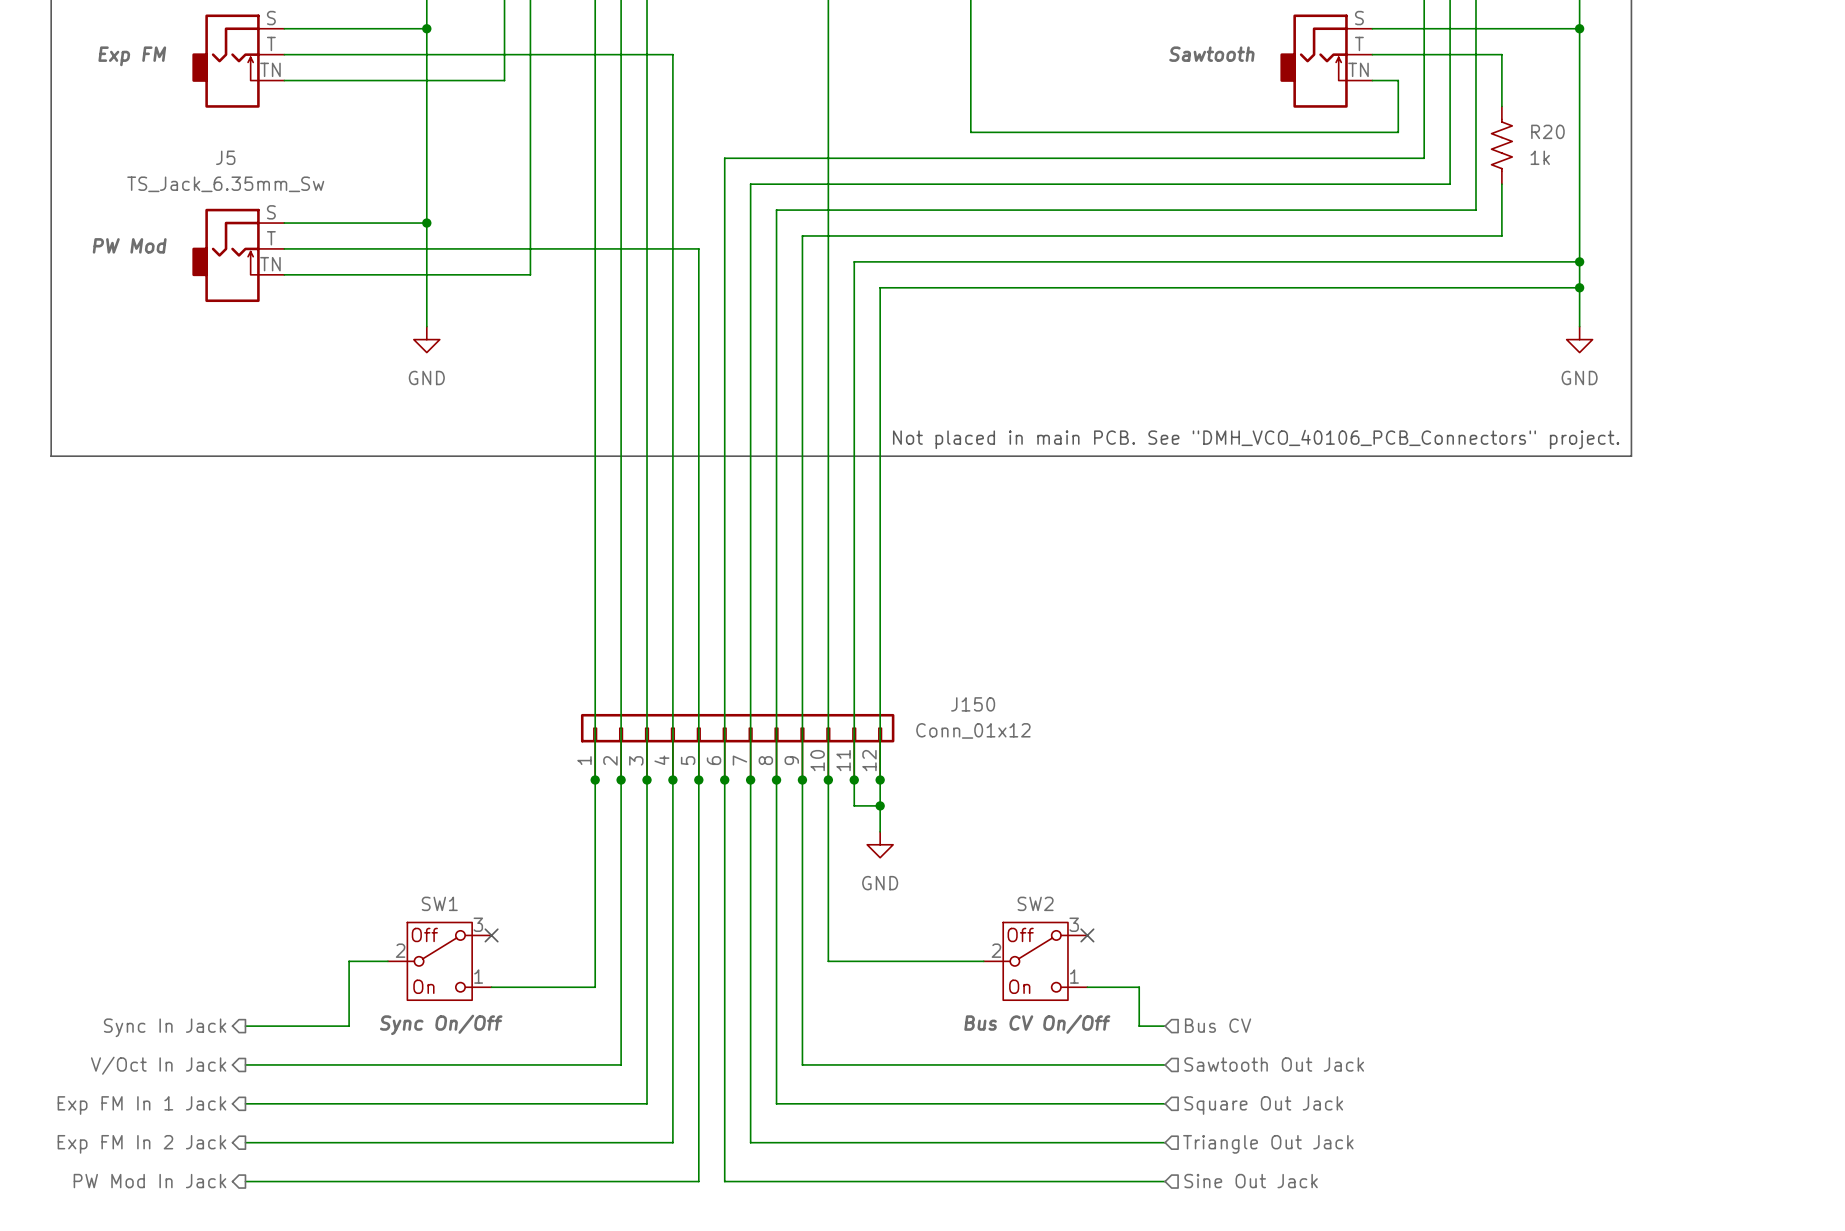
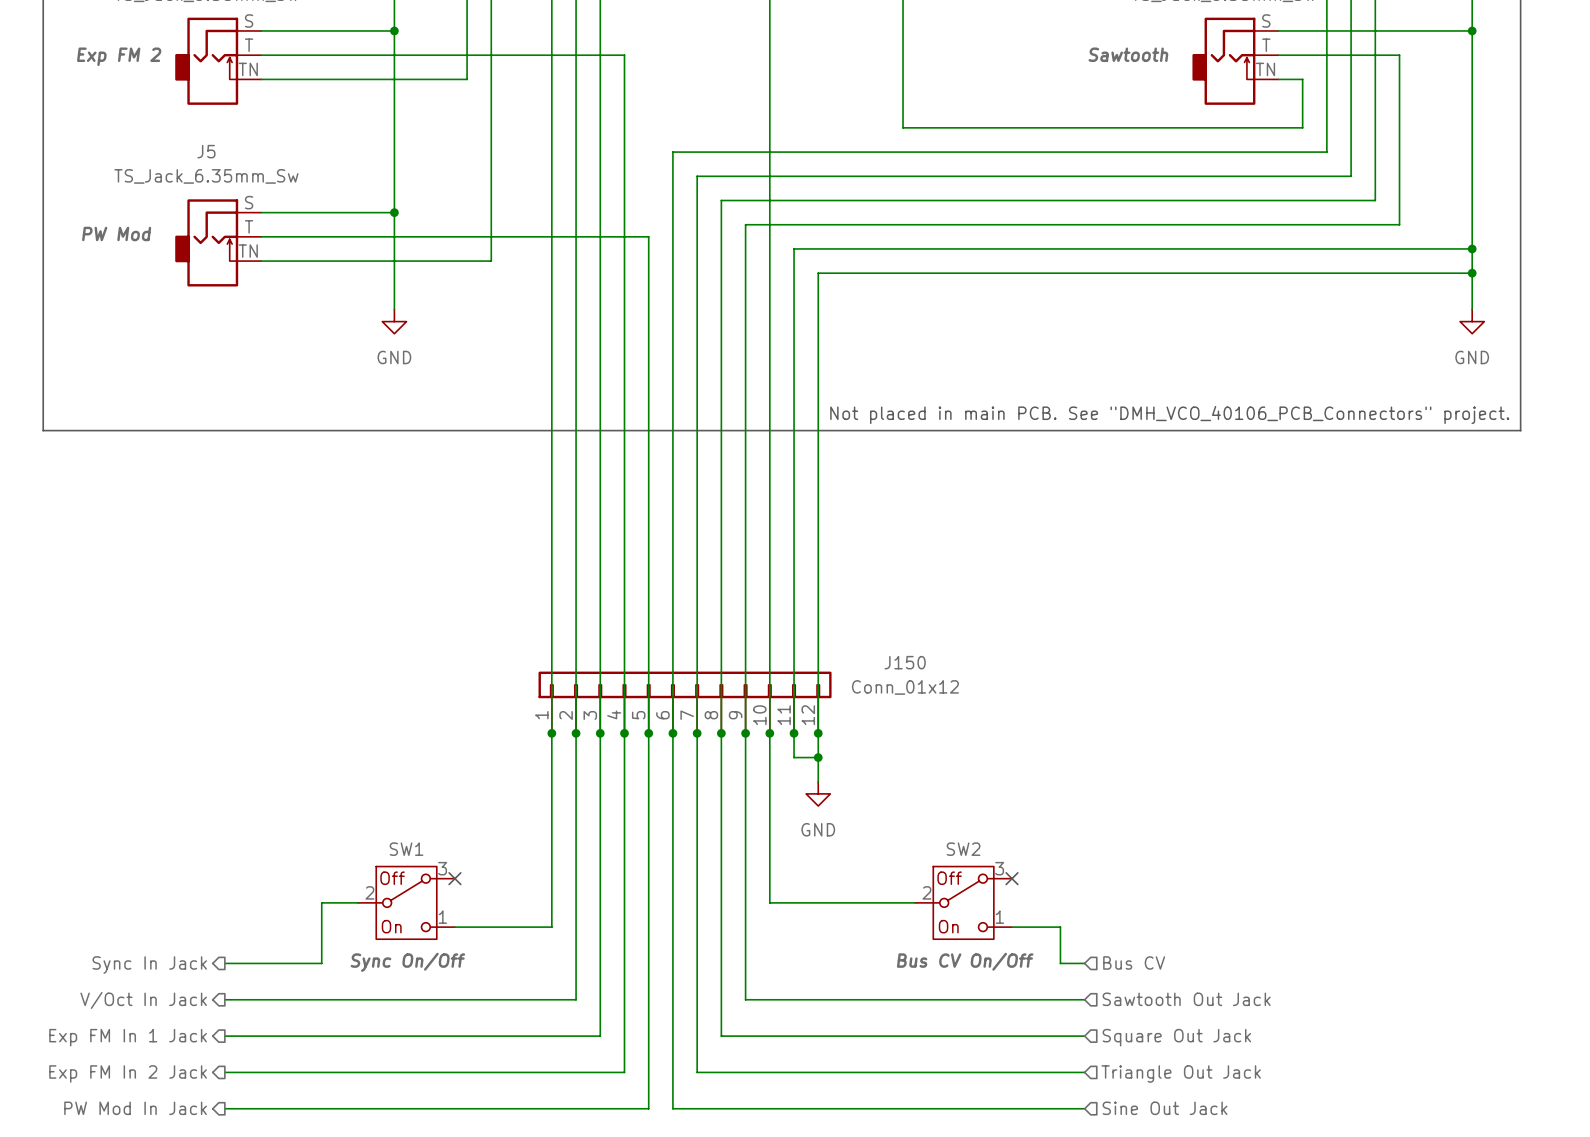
part text: Exp FM (132, 56) -> Exp FM 2 (119, 56)
R20: 1k (1501, 145) -> none

